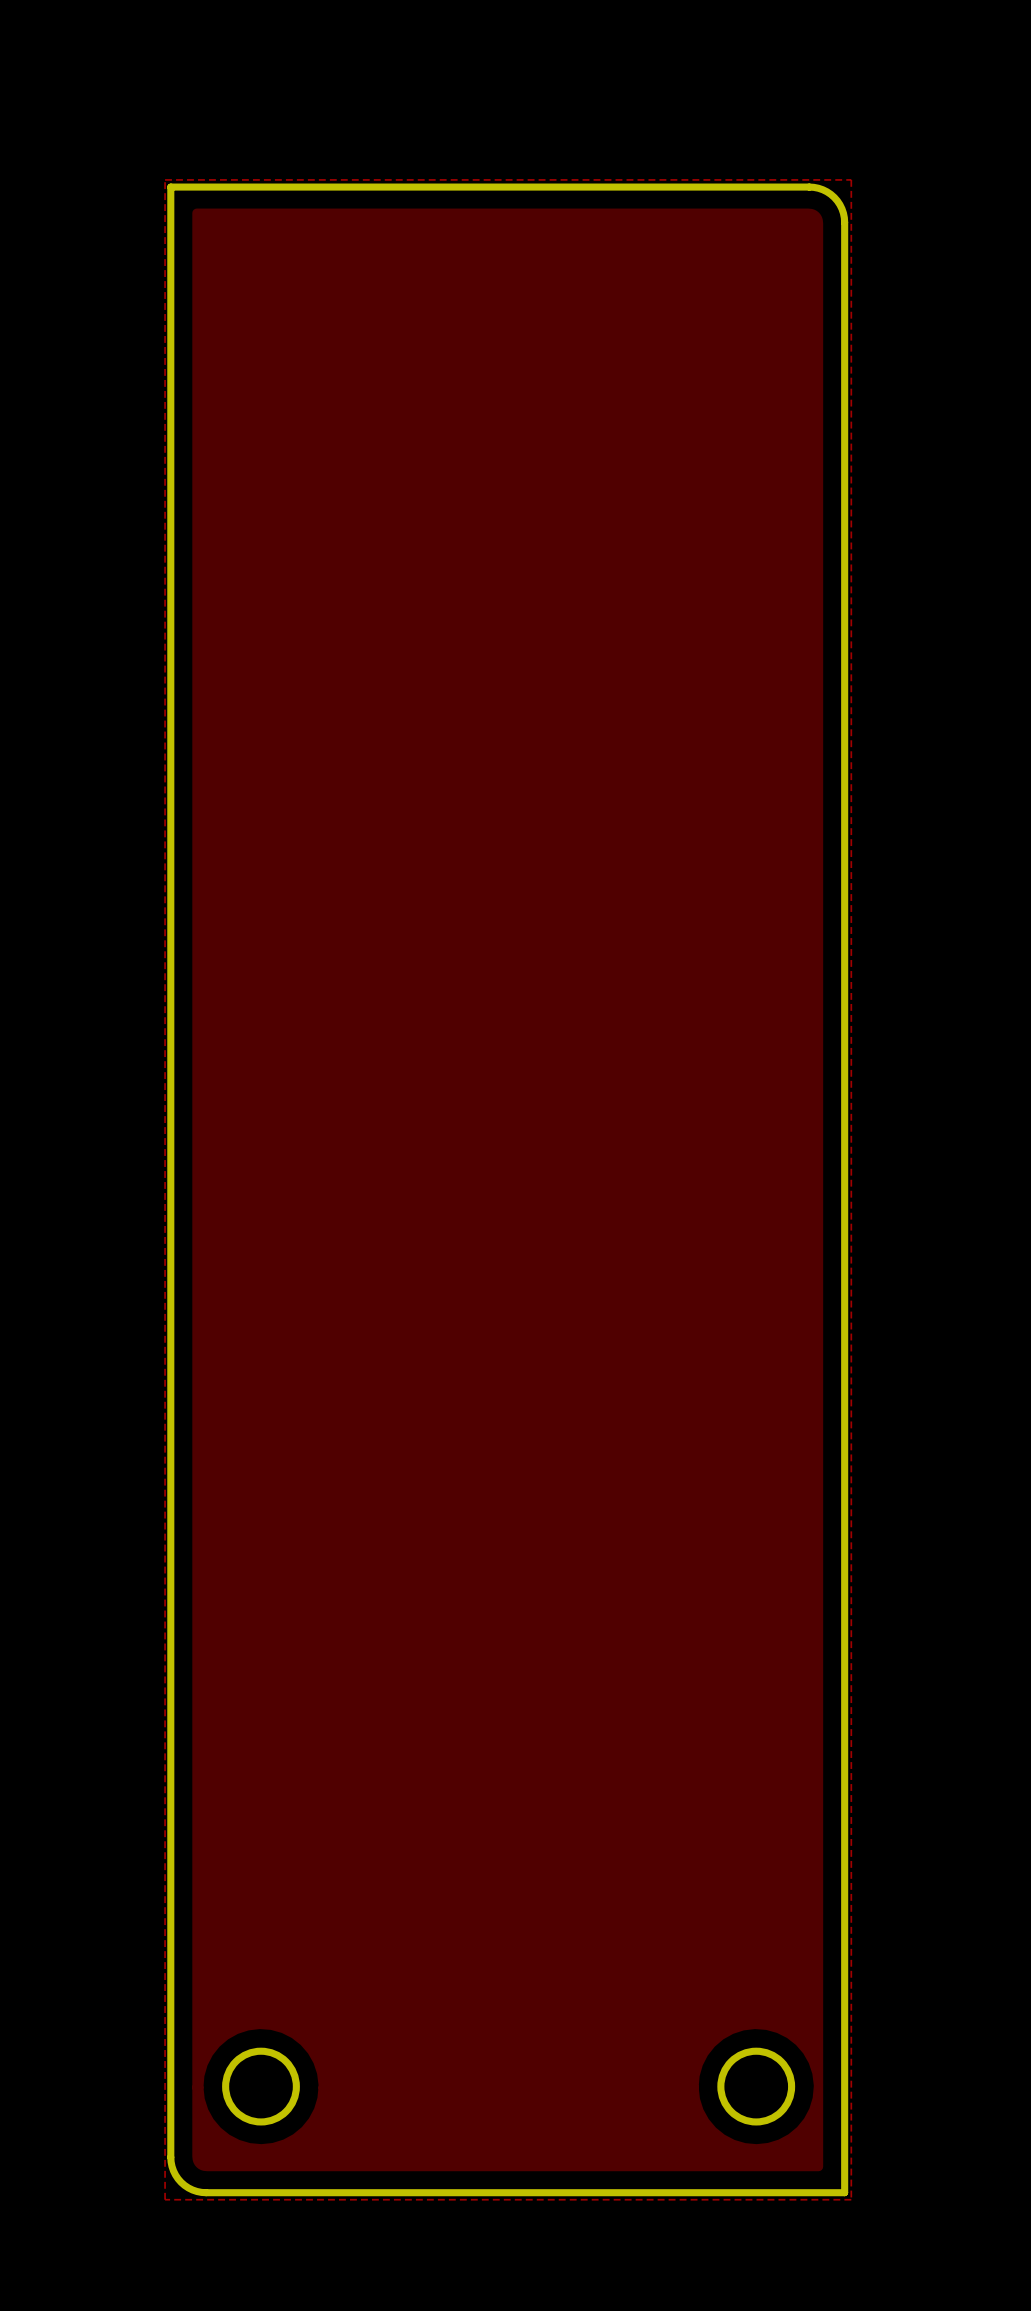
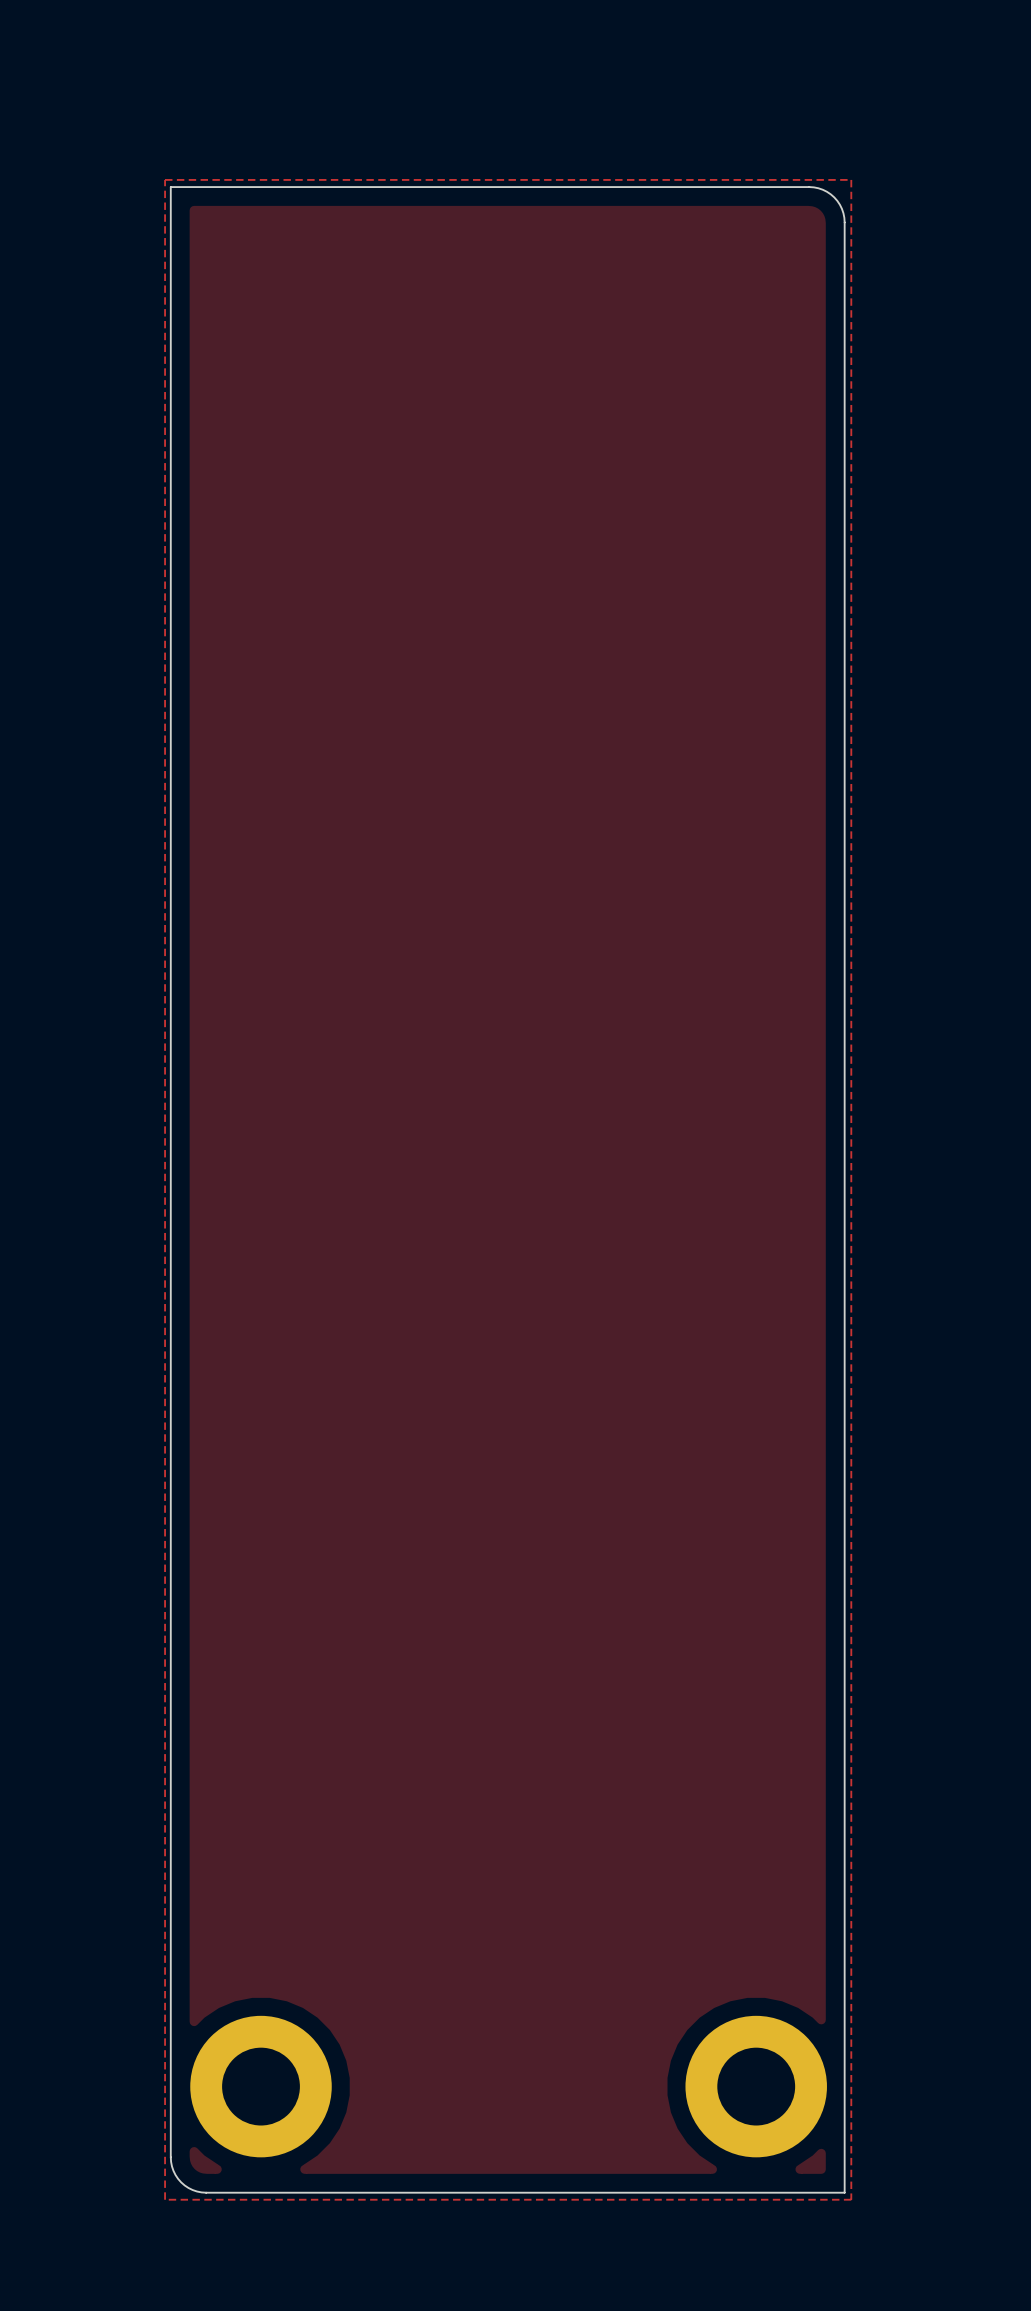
board edge width: thick (170, 187) (809, 187) (822, 189) (830, 194) (837, 200) (843, 213) (844, 2192) (206, 2192) (197, 2191) (184, 2185) (178, 2178) (172, 2166) (170, 187) -> thin (170, 187) (809, 187) (822, 189) (830, 194) (837, 200) (843, 213) (844, 2192) (206, 2192) (197, 2191) (184, 2185) (178, 2178) (172, 2166) (170, 187)
round board edge: [222, 2047, 300, 2126] -> none
round board edge: [717, 2047, 796, 2126] -> none
part: none -> (261, 2086)
part: none -> (756, 2086)

